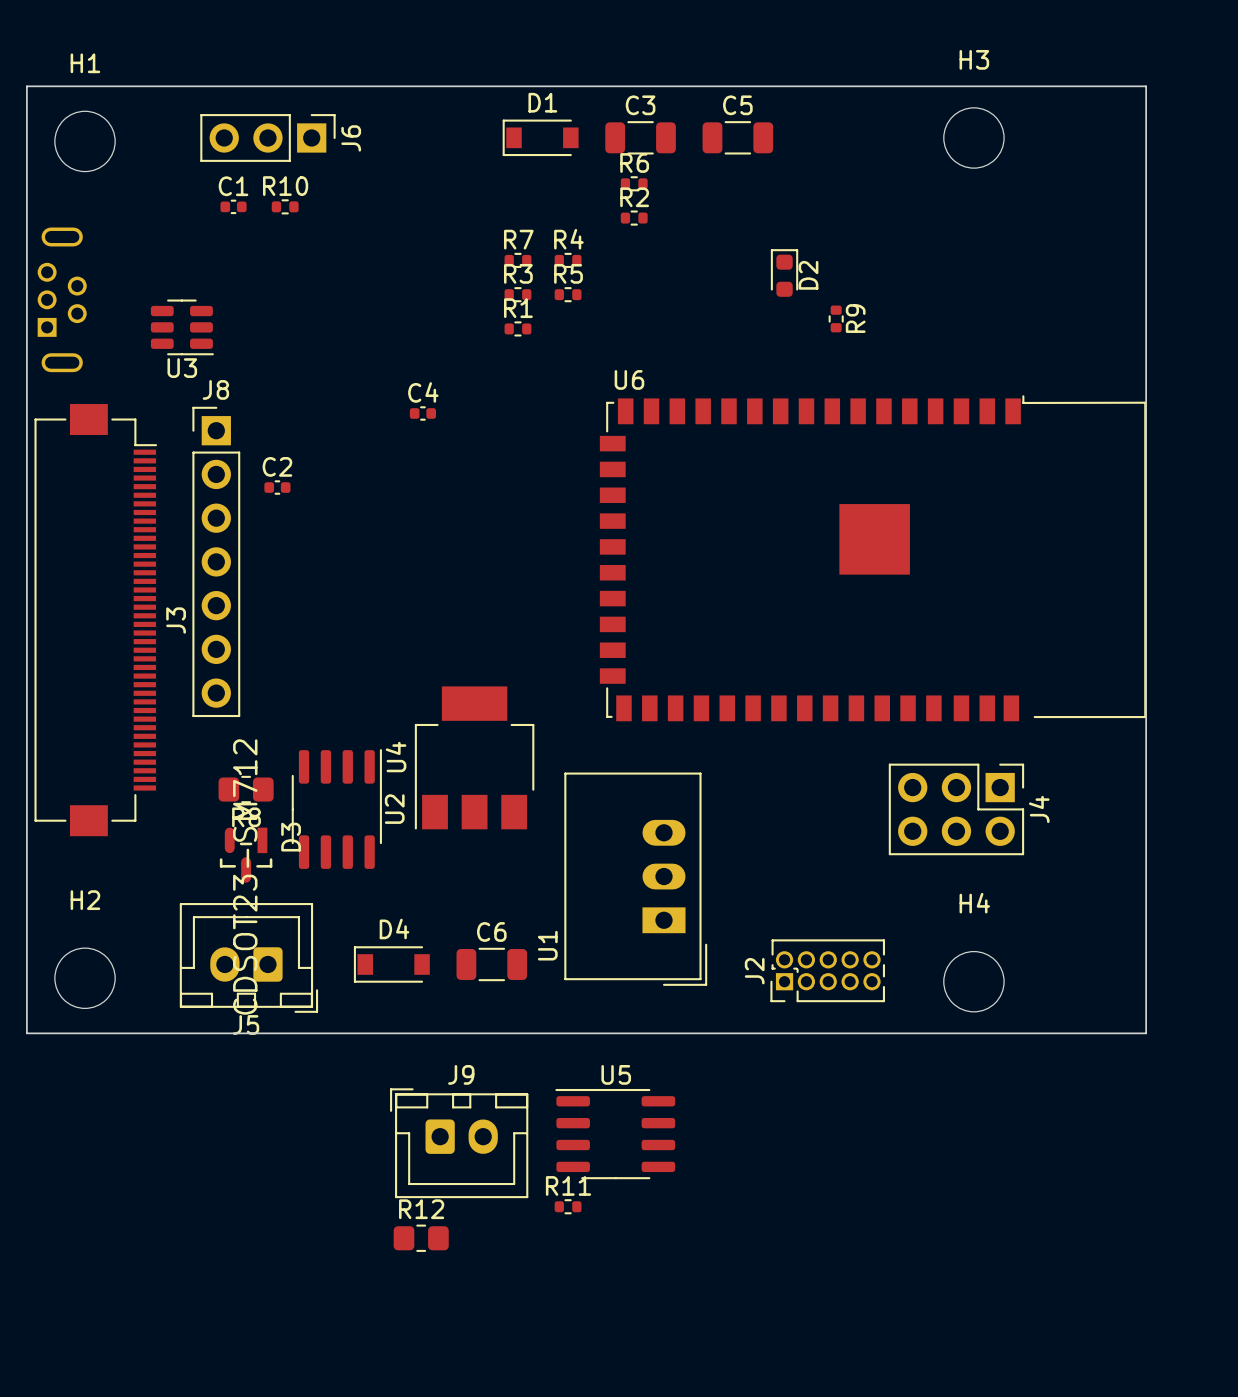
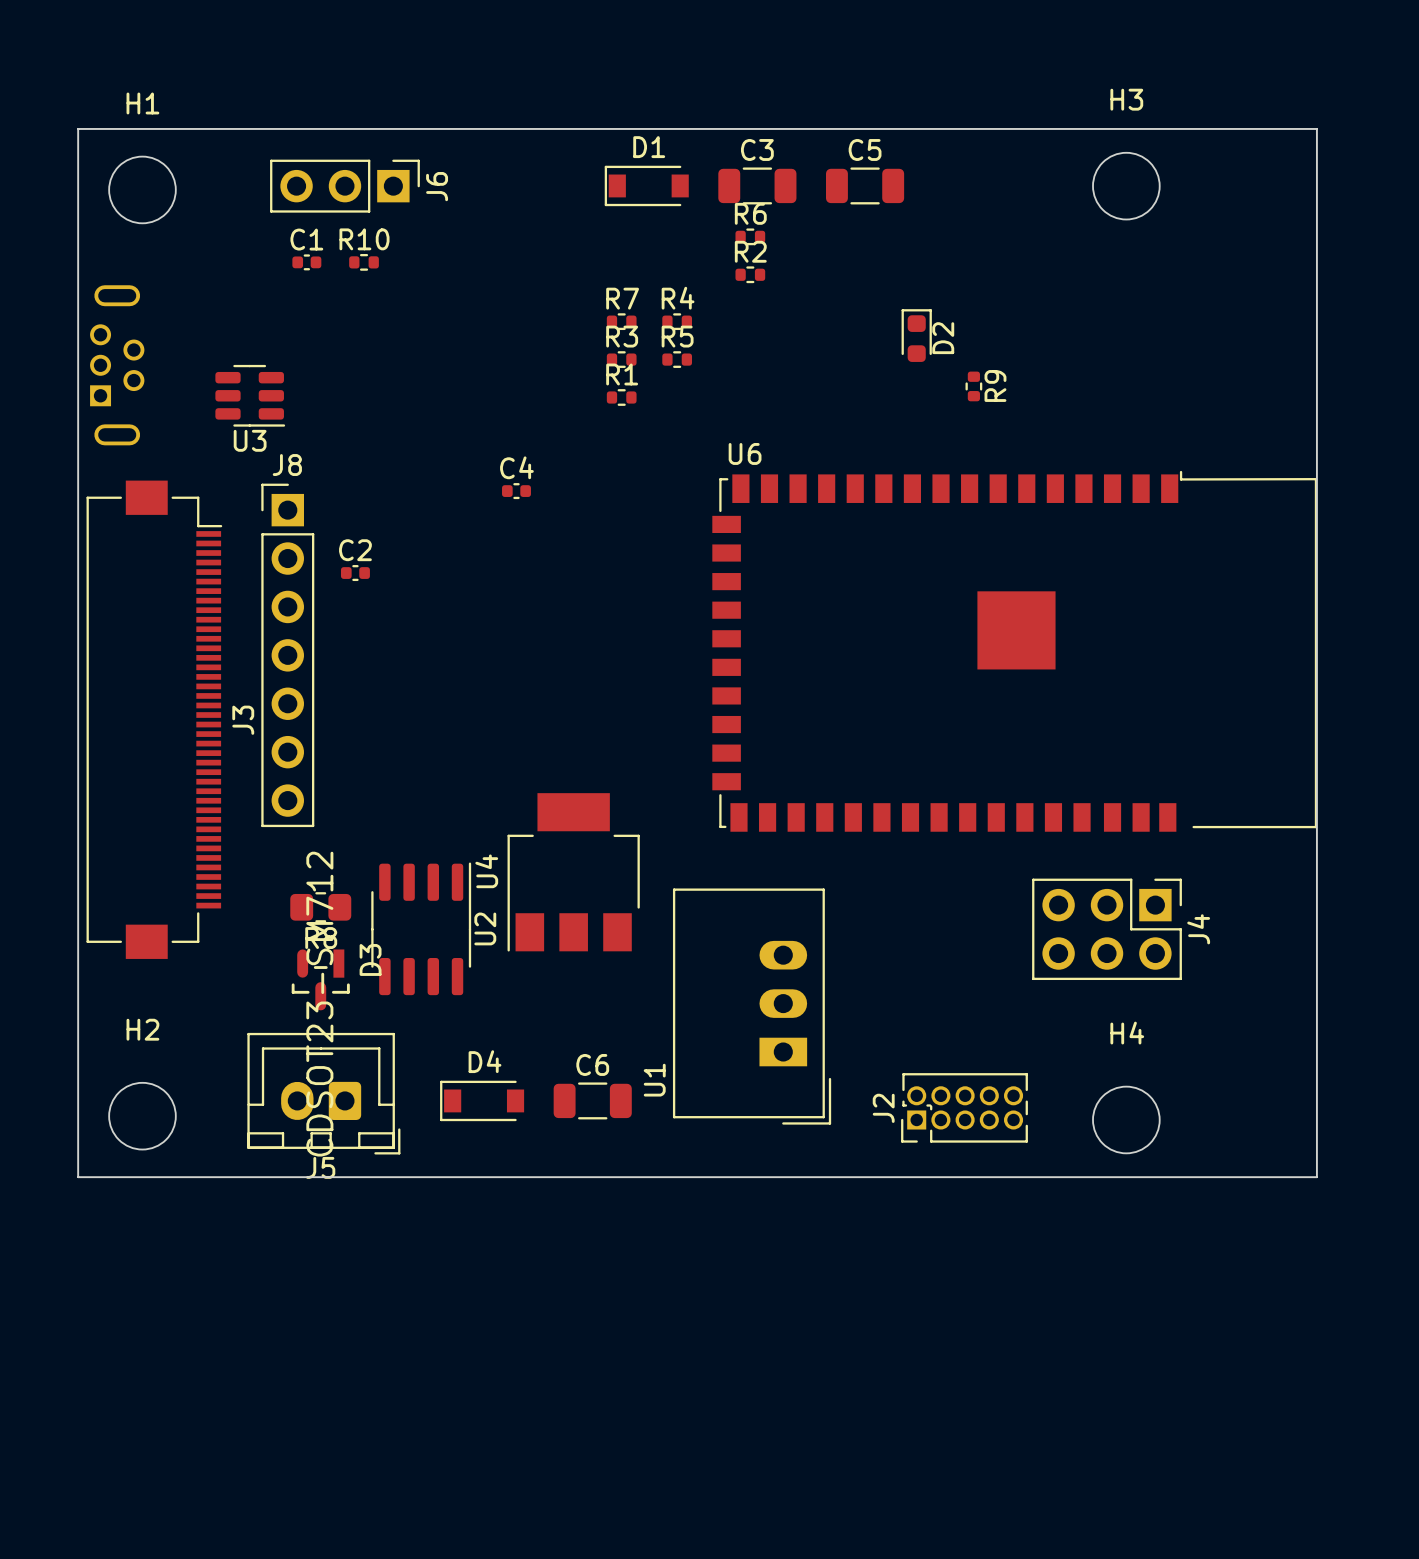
U5: (615, 1134) -> none
J9: (459, 1143) -> none
R11: (568, 1206) -> none
R12: (421, 1238) -> none

